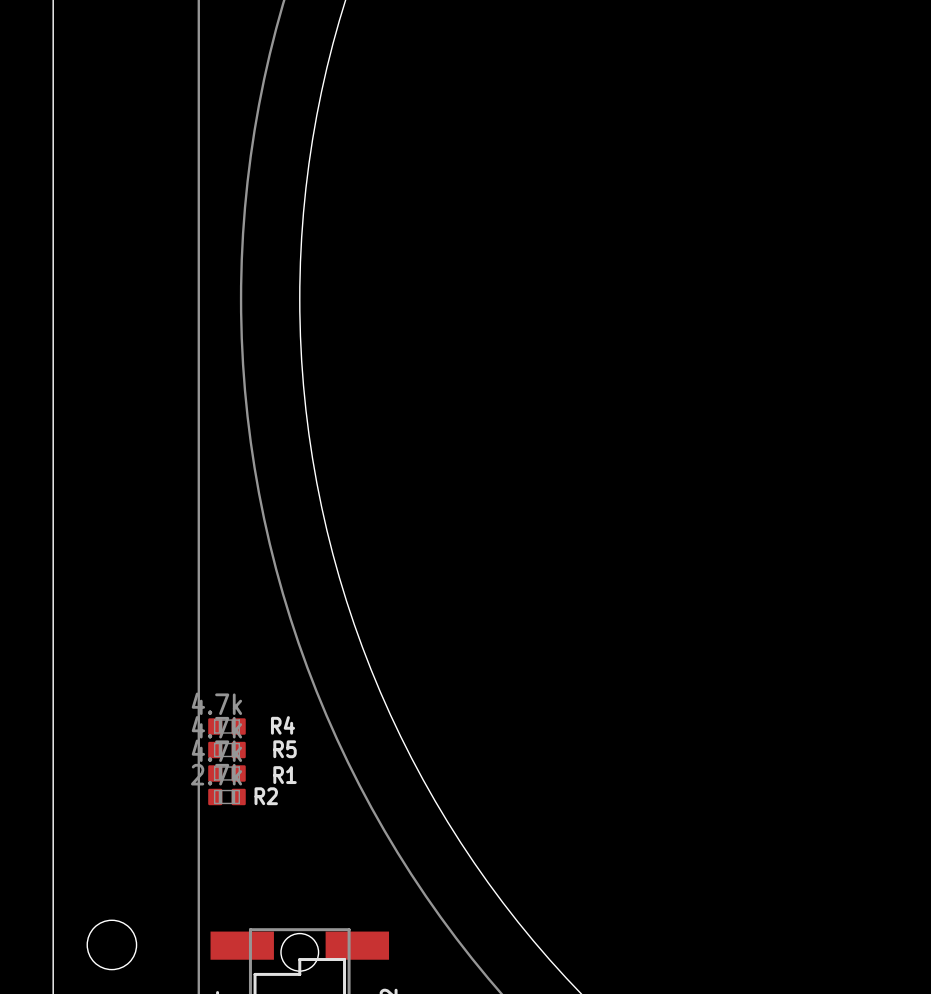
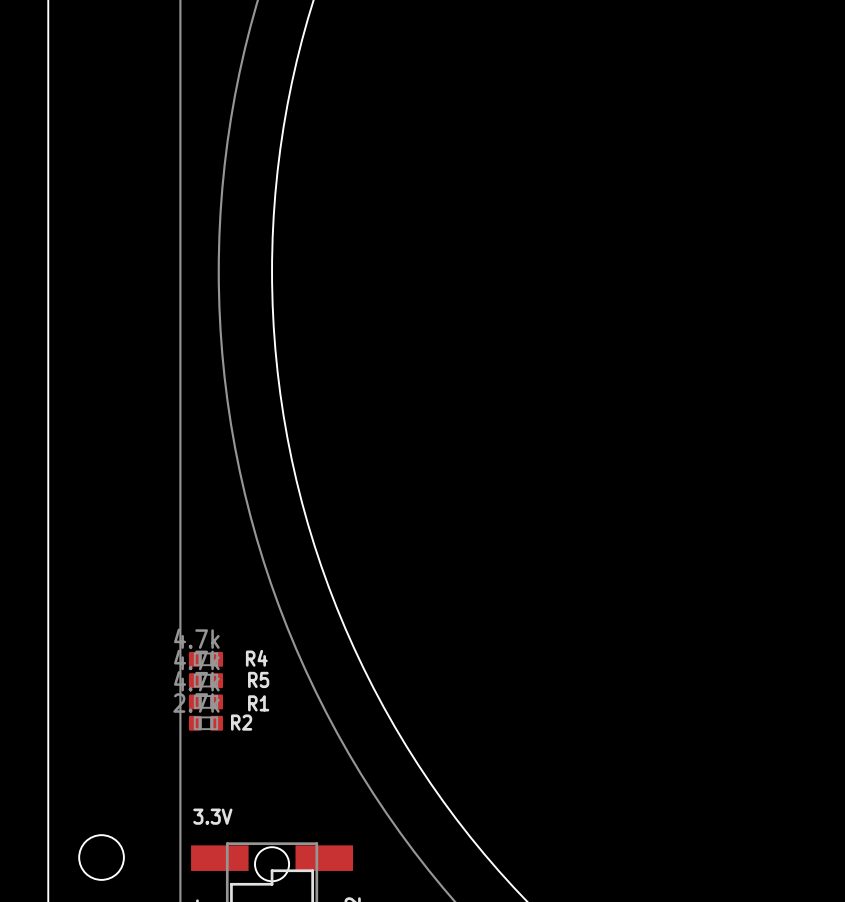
text: none -> 3.3V (212, 816)

